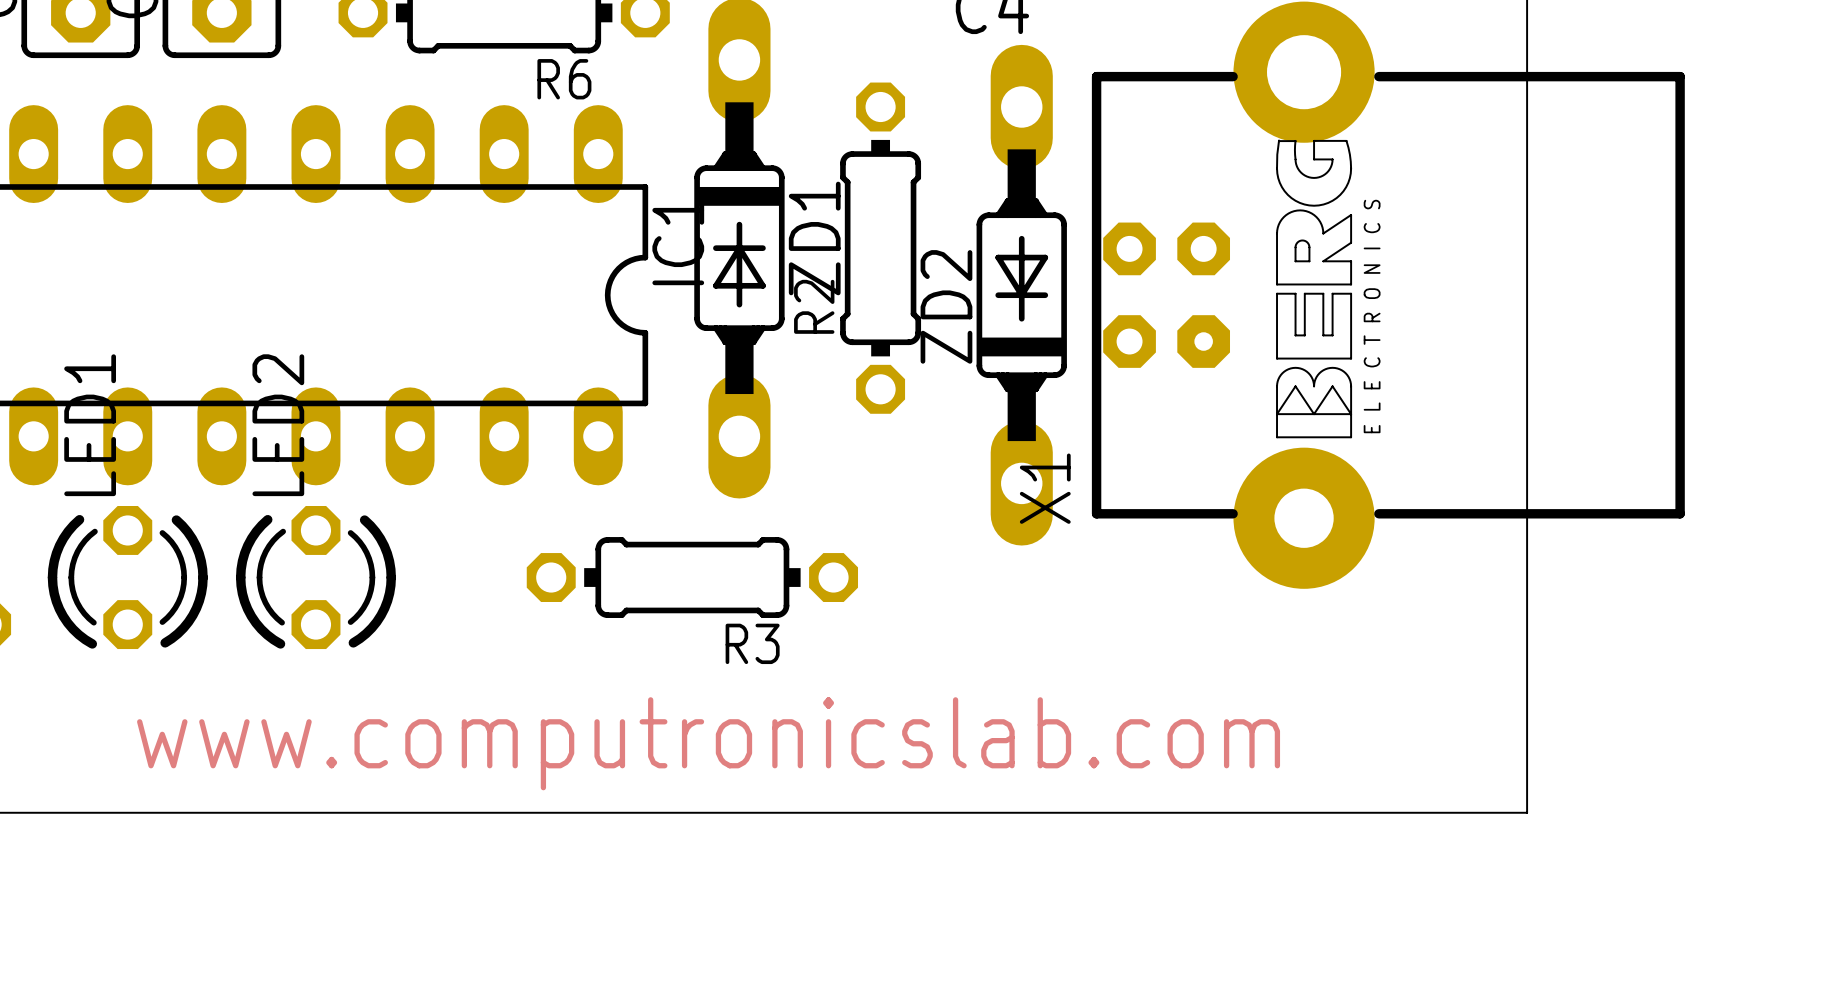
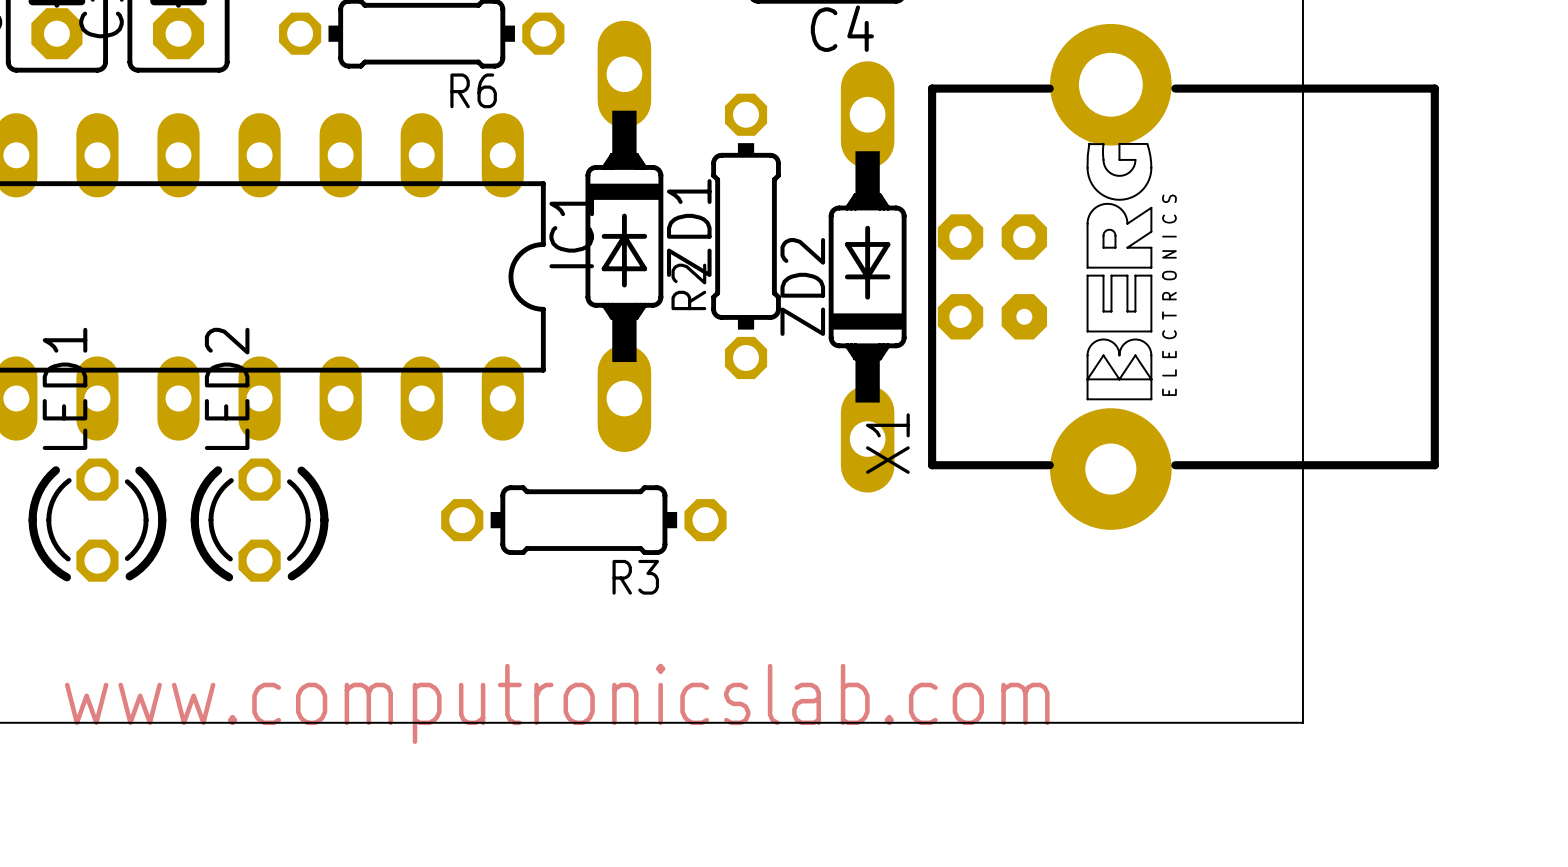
text position: www.computronicslab.com (708, 743) -> www.computronicslab.com (557, 703)

